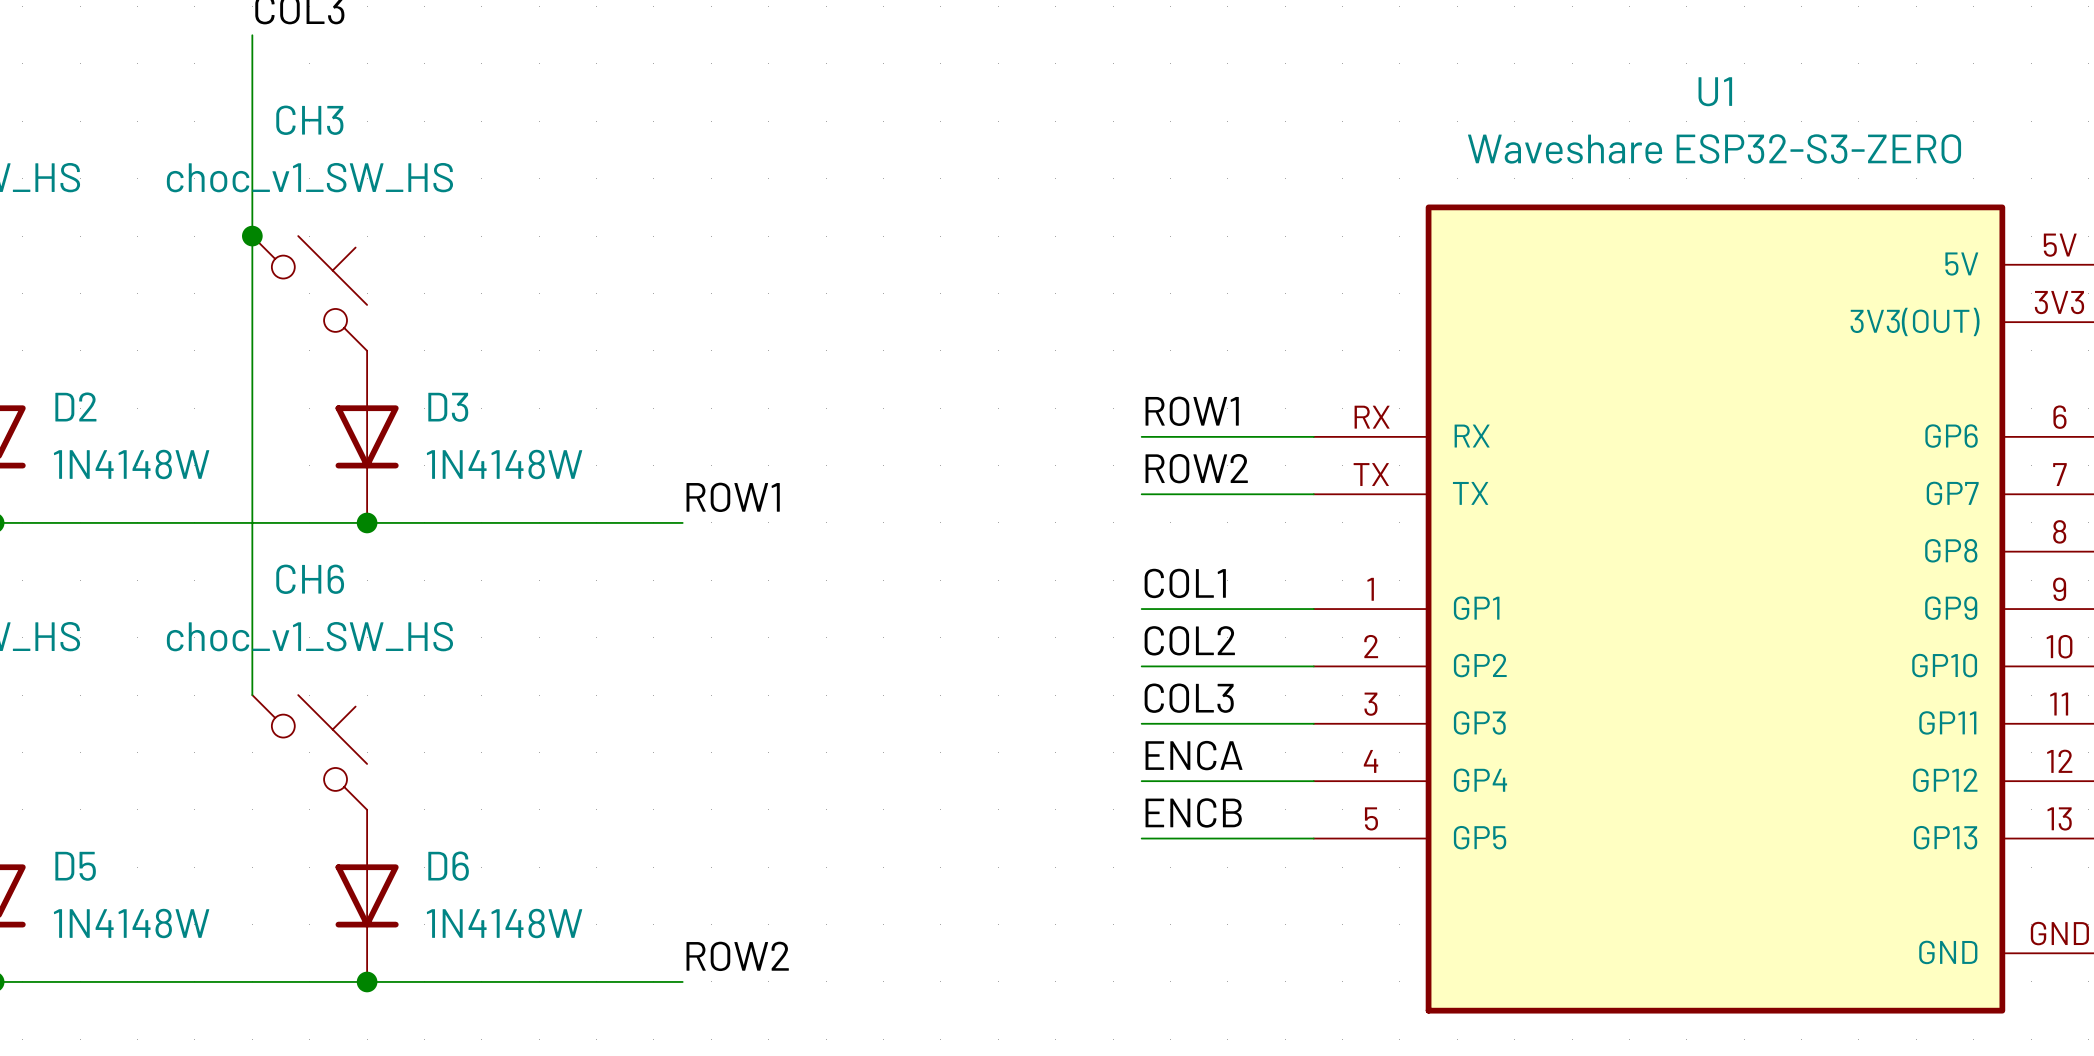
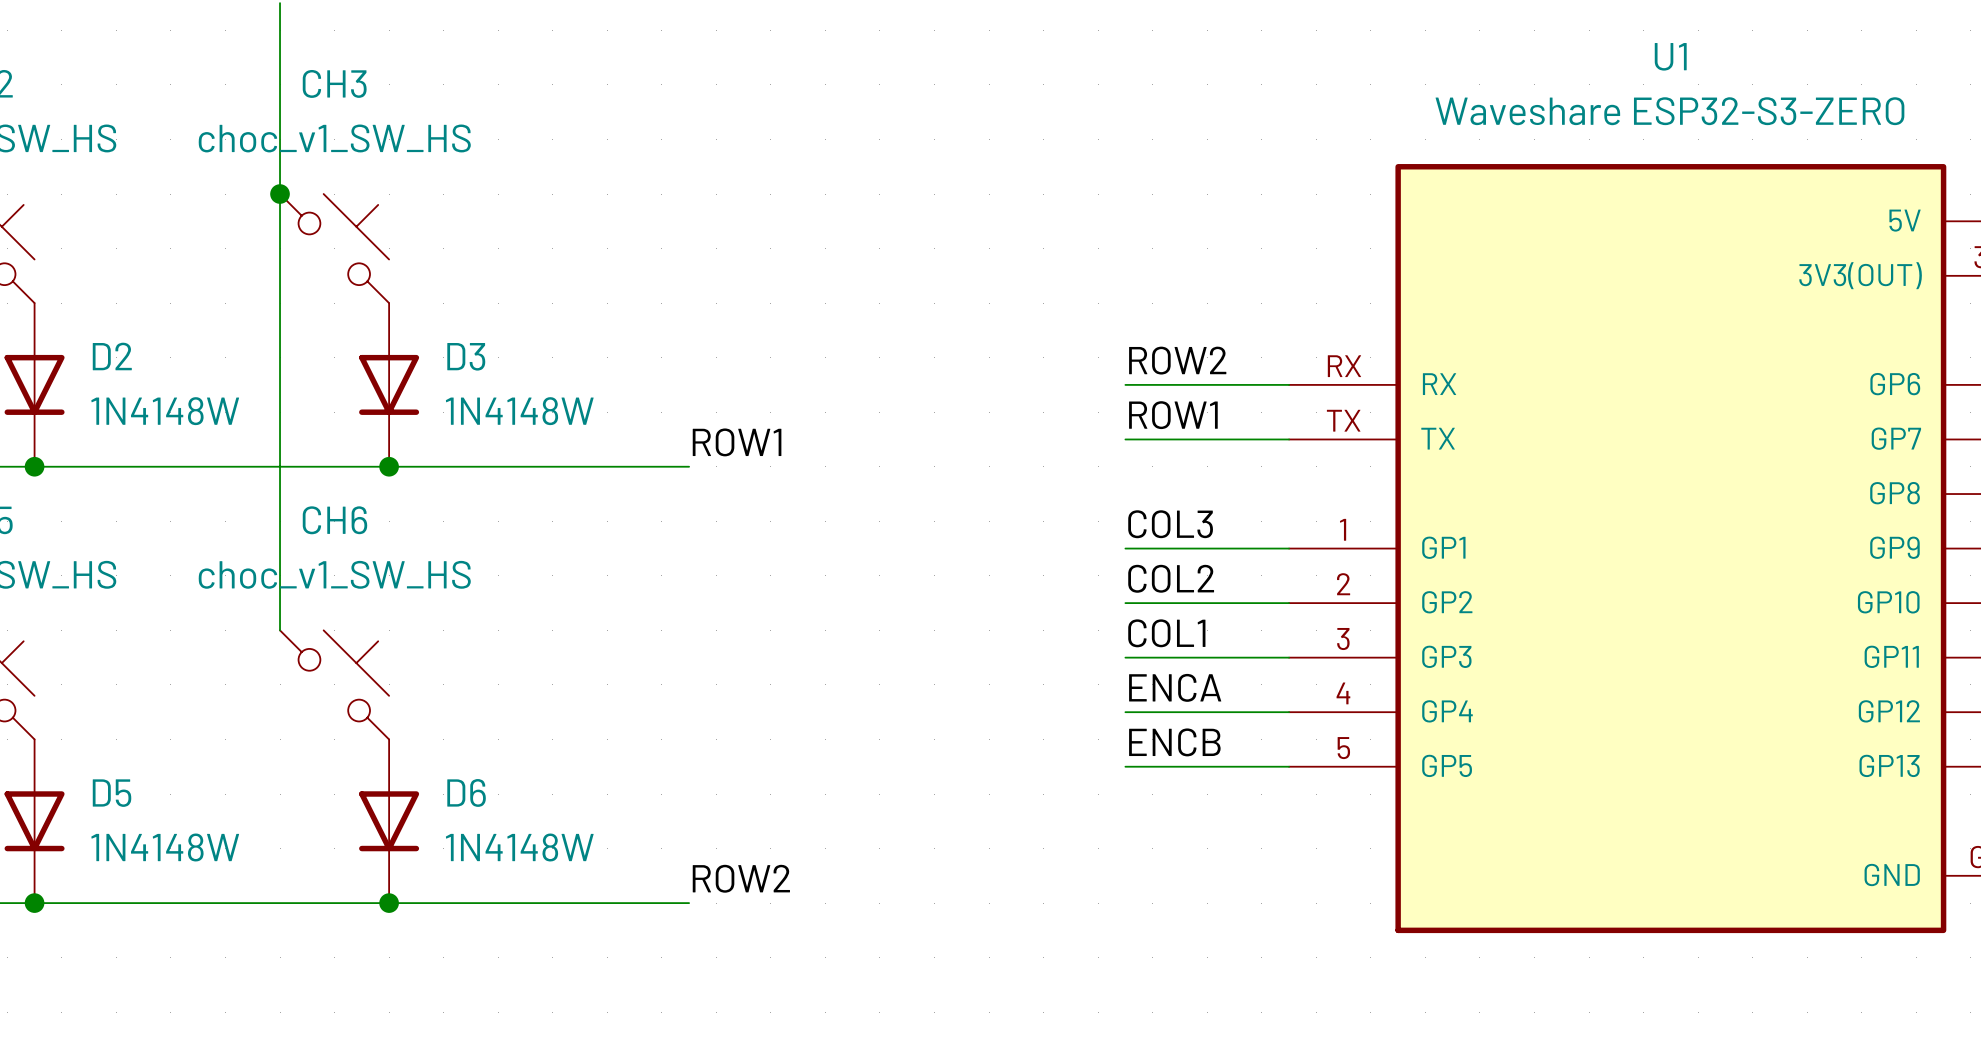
label: ROW1 (1192, 411) -> ROW2 (1177, 360)
label: ROW2 (1196, 468) -> ROW1 (1173, 415)
label: COL1 (1185, 583) -> COL3 (1170, 524)
label: COL3 (1189, 698) -> COL1 (1166, 633)

